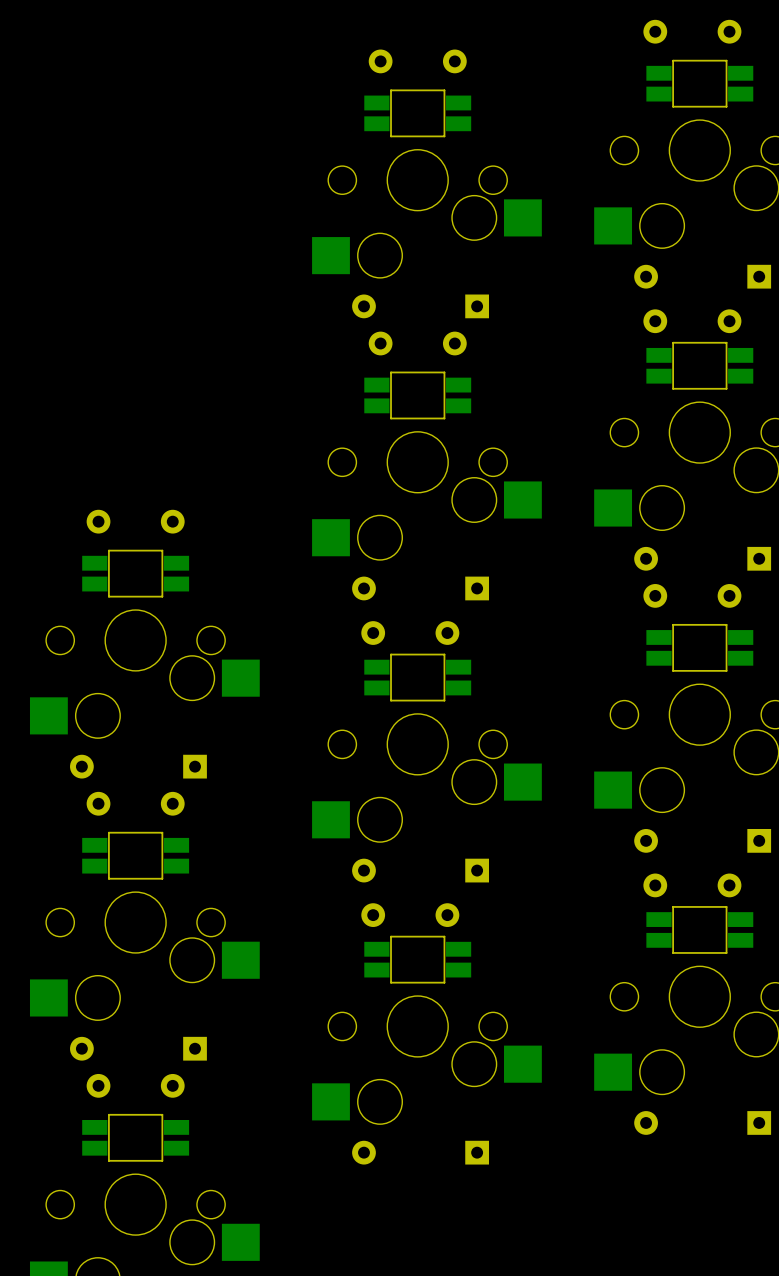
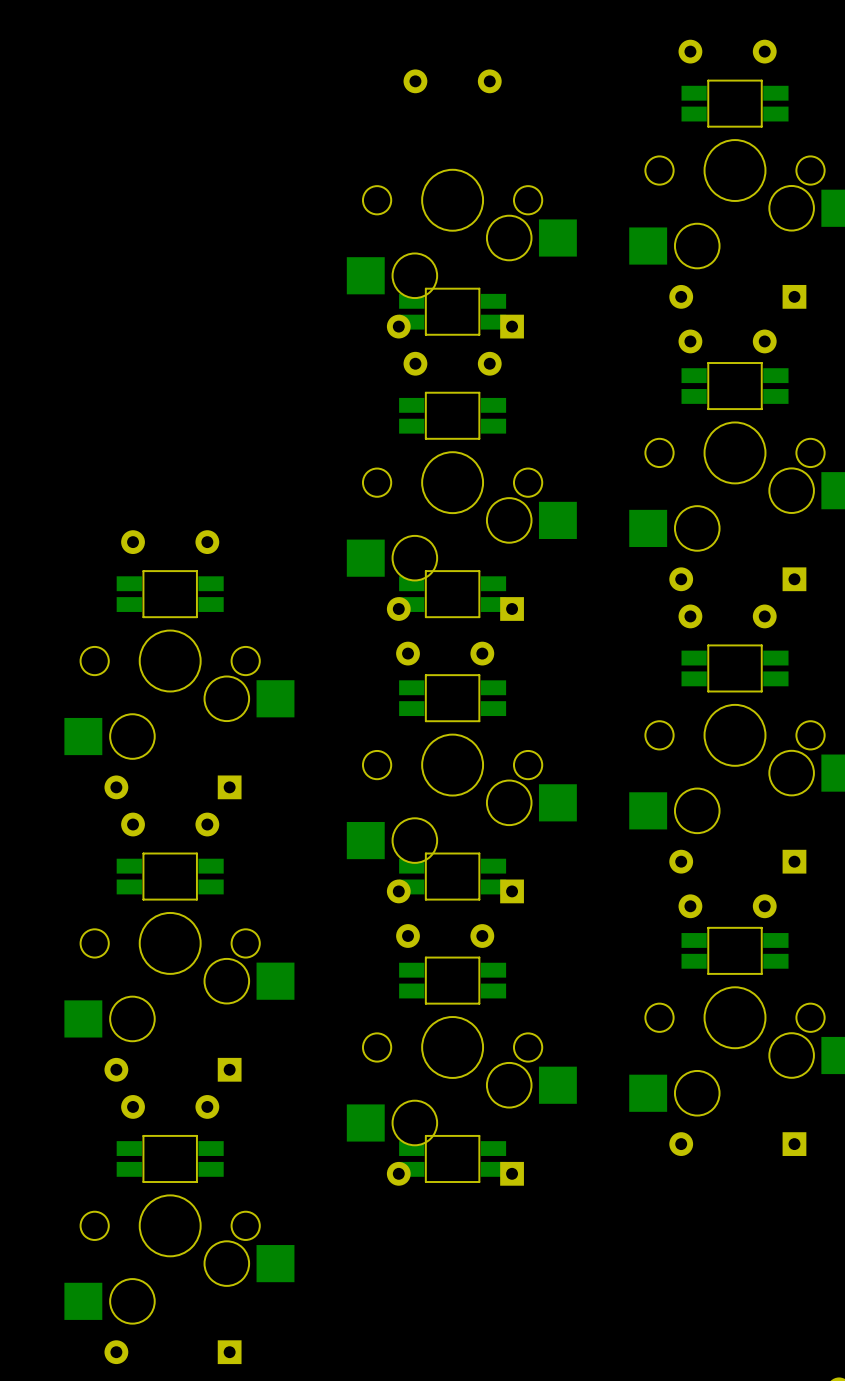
part position: (417, 113) -> (452, 311)
part: none -> (452, 594)
part: none -> (452, 876)
part: none -> (452, 1158)

